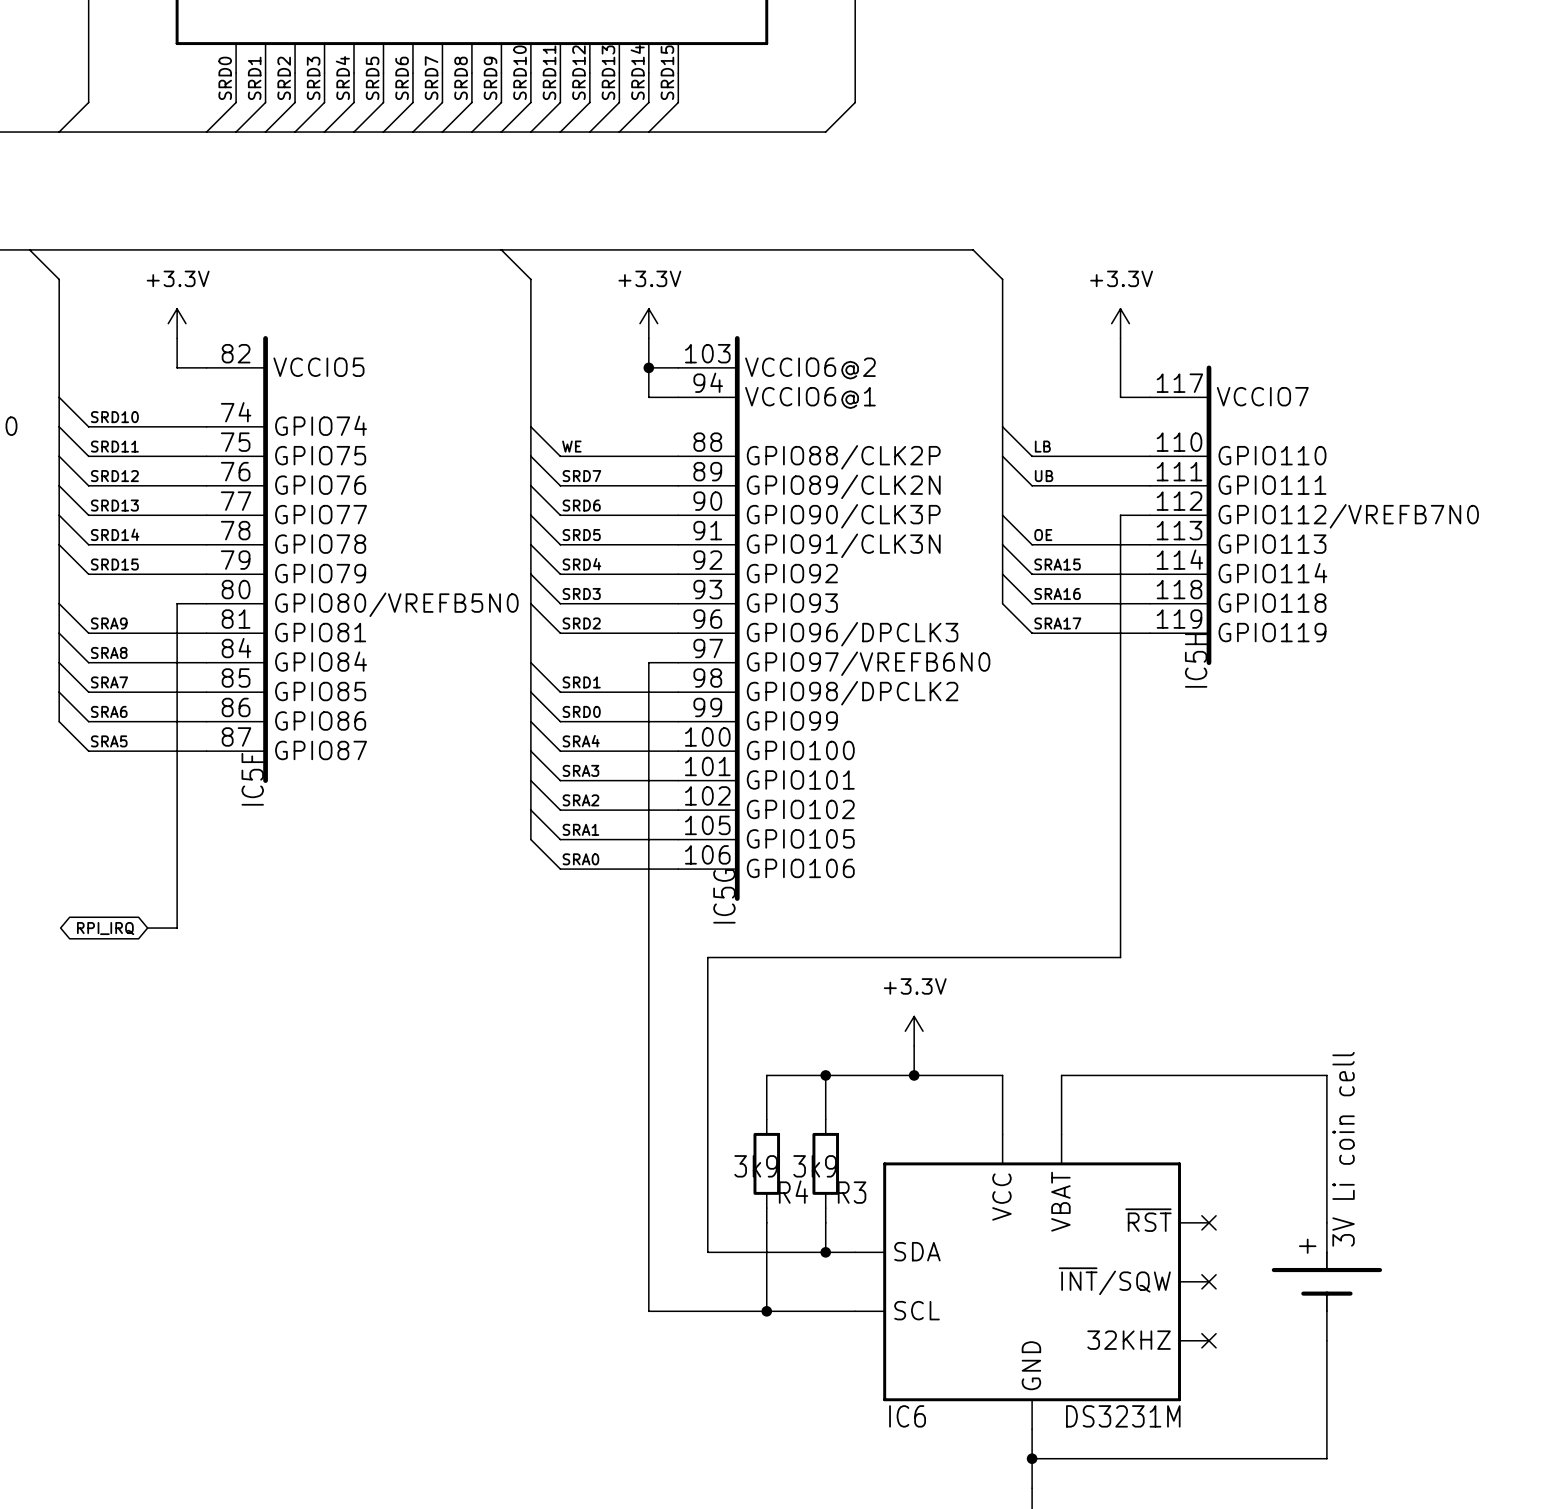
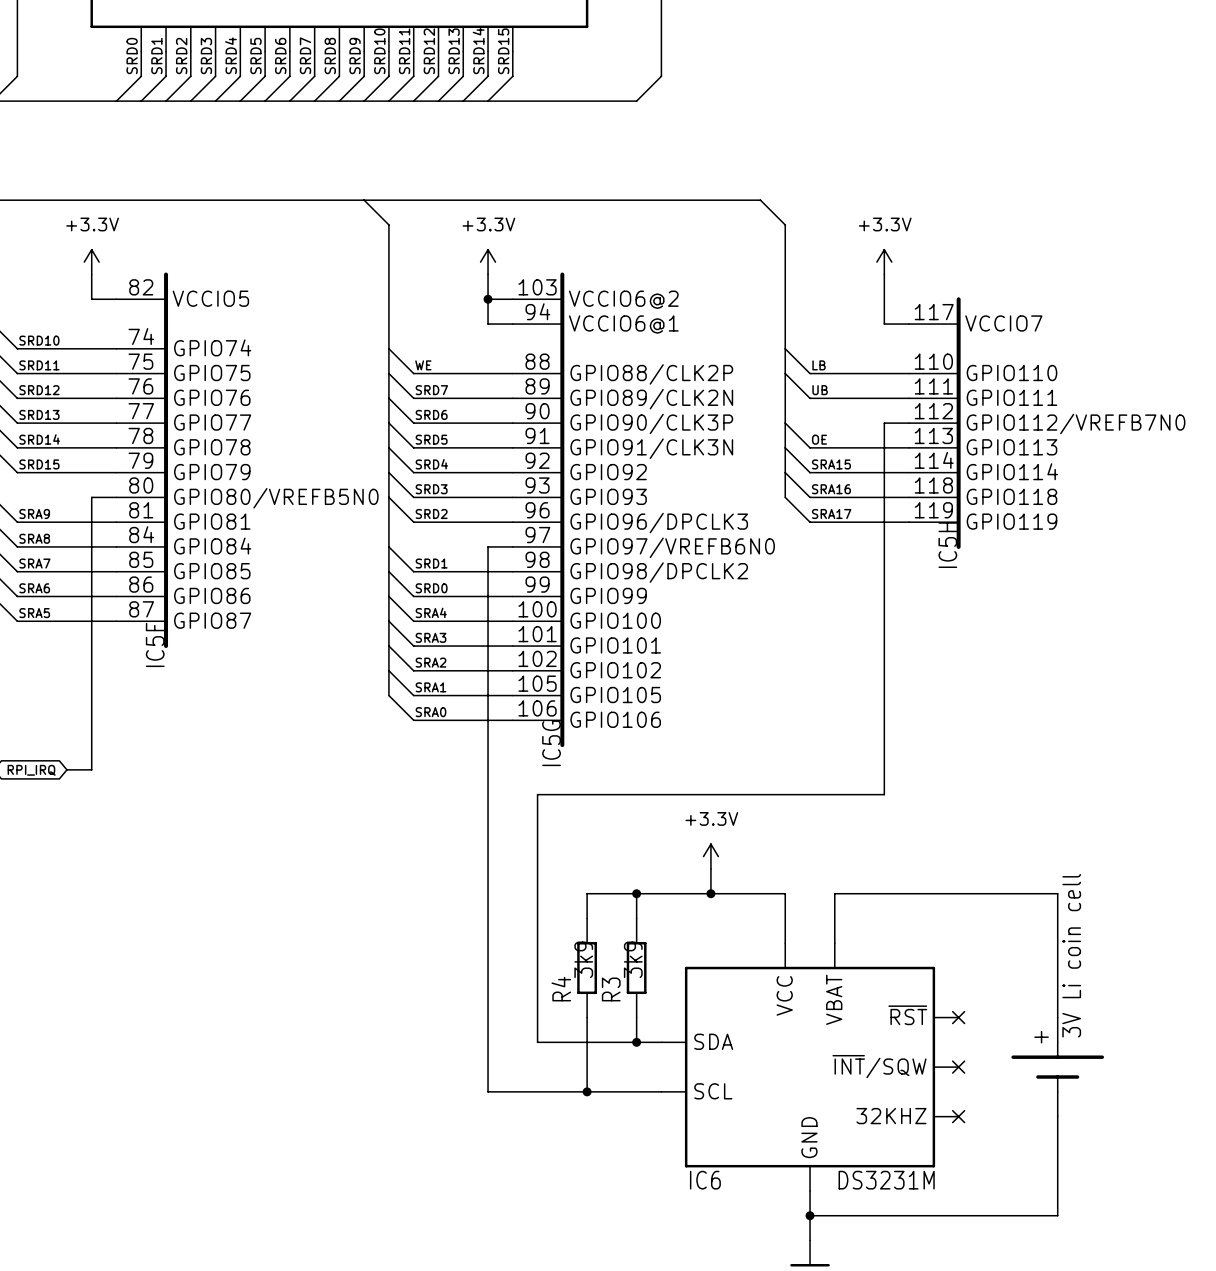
R4 symbol: [753, 1119, 781, 1209] -> [577, 918, 598, 1018]
R3 symbol: [812, 1119, 839, 1209] -> [626, 918, 647, 1018]
R4 name position: R4 (793, 1192) -> R4 (561, 989)
R3 name position: R3 (852, 1192) -> R3 (611, 989)

